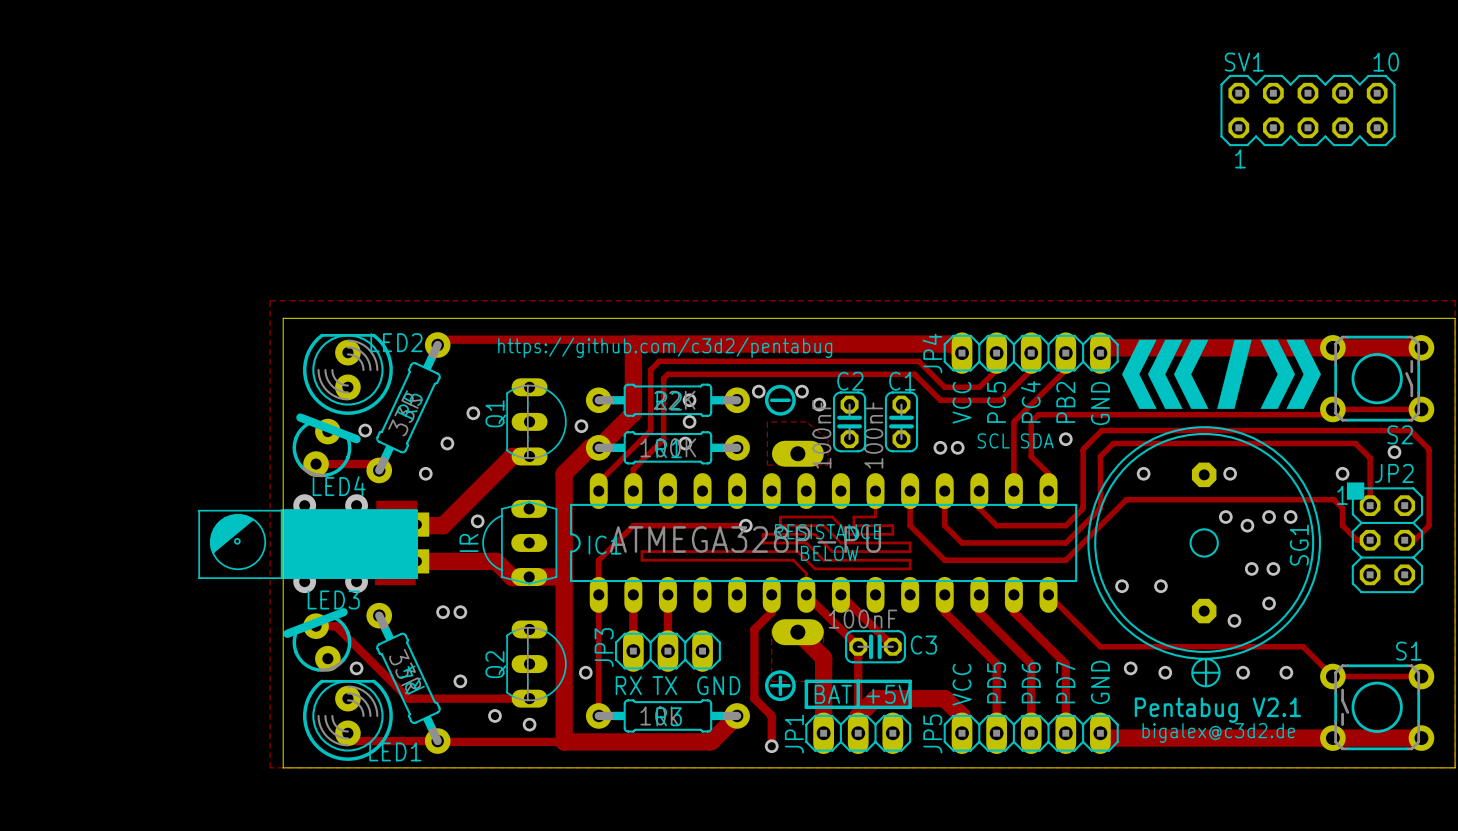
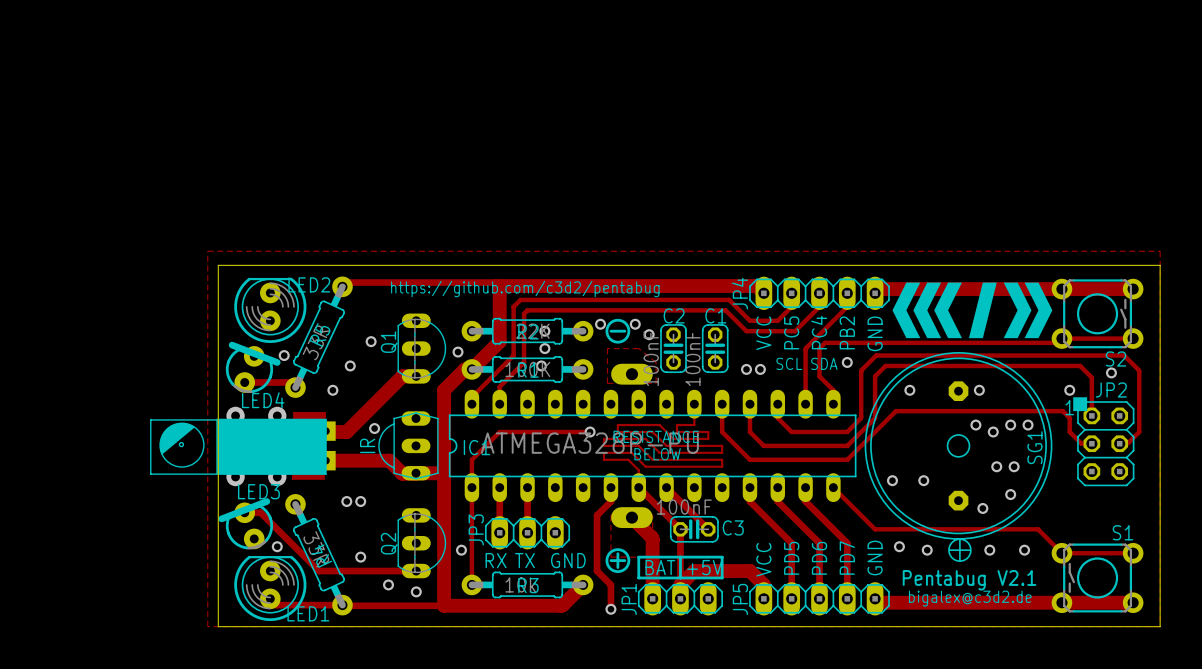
SV1: (1307, 110) -> none
track: (763, 551) (642, 551) (642, 560) (763, 560) -> (603, 452) (603, 459)

